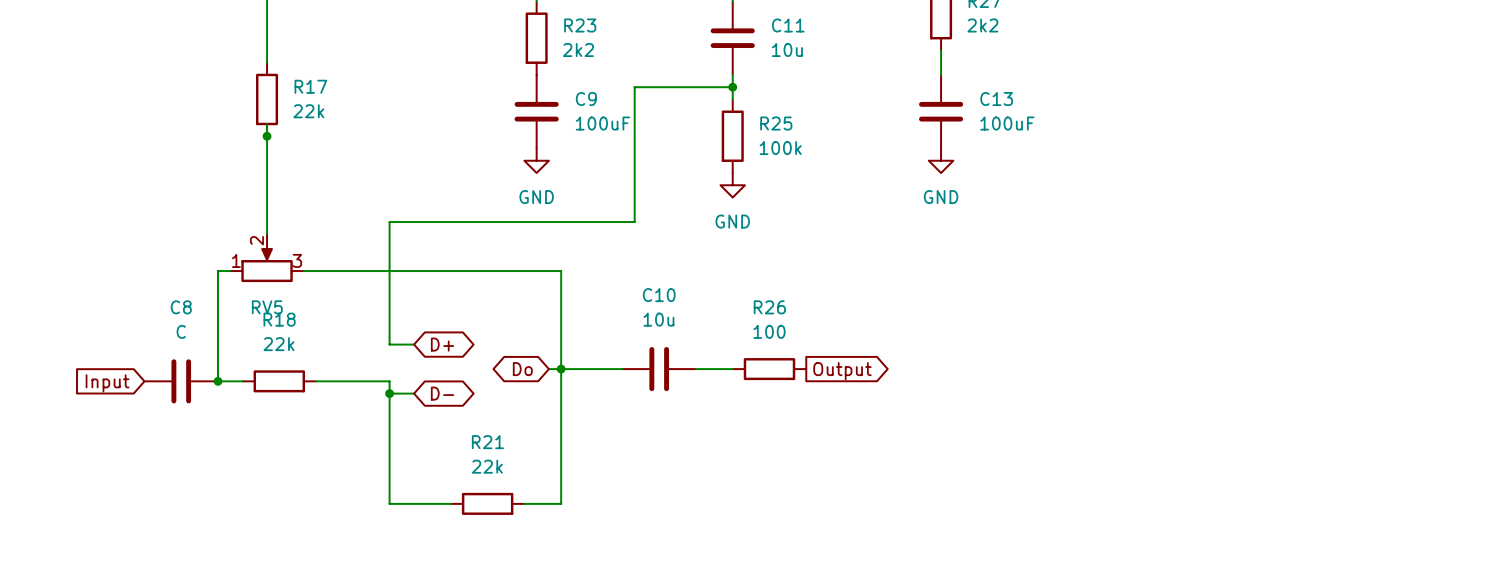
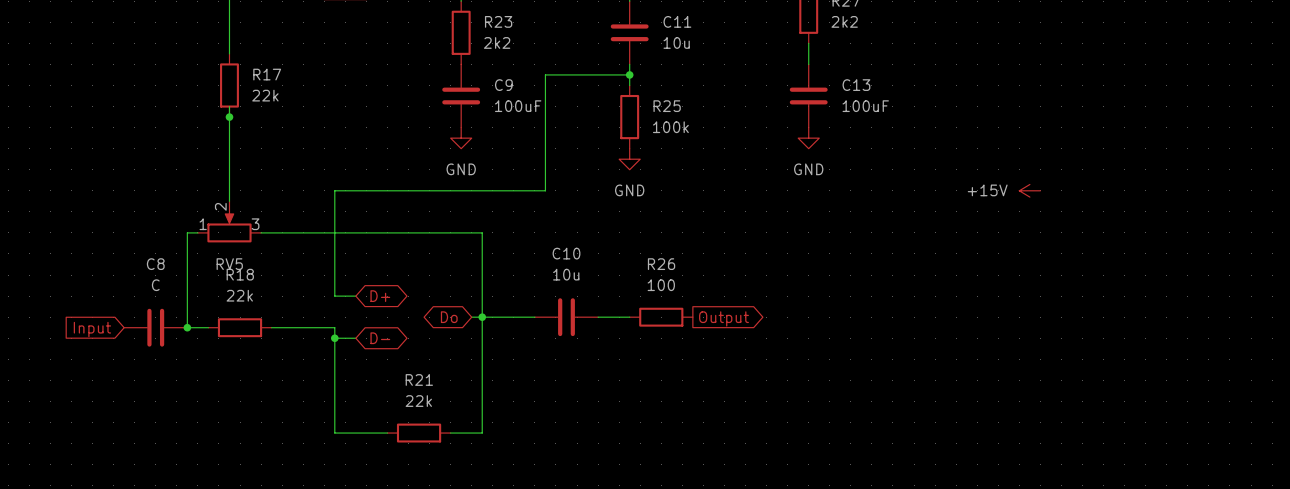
power symbol: none -> +15V (1029, 190)

